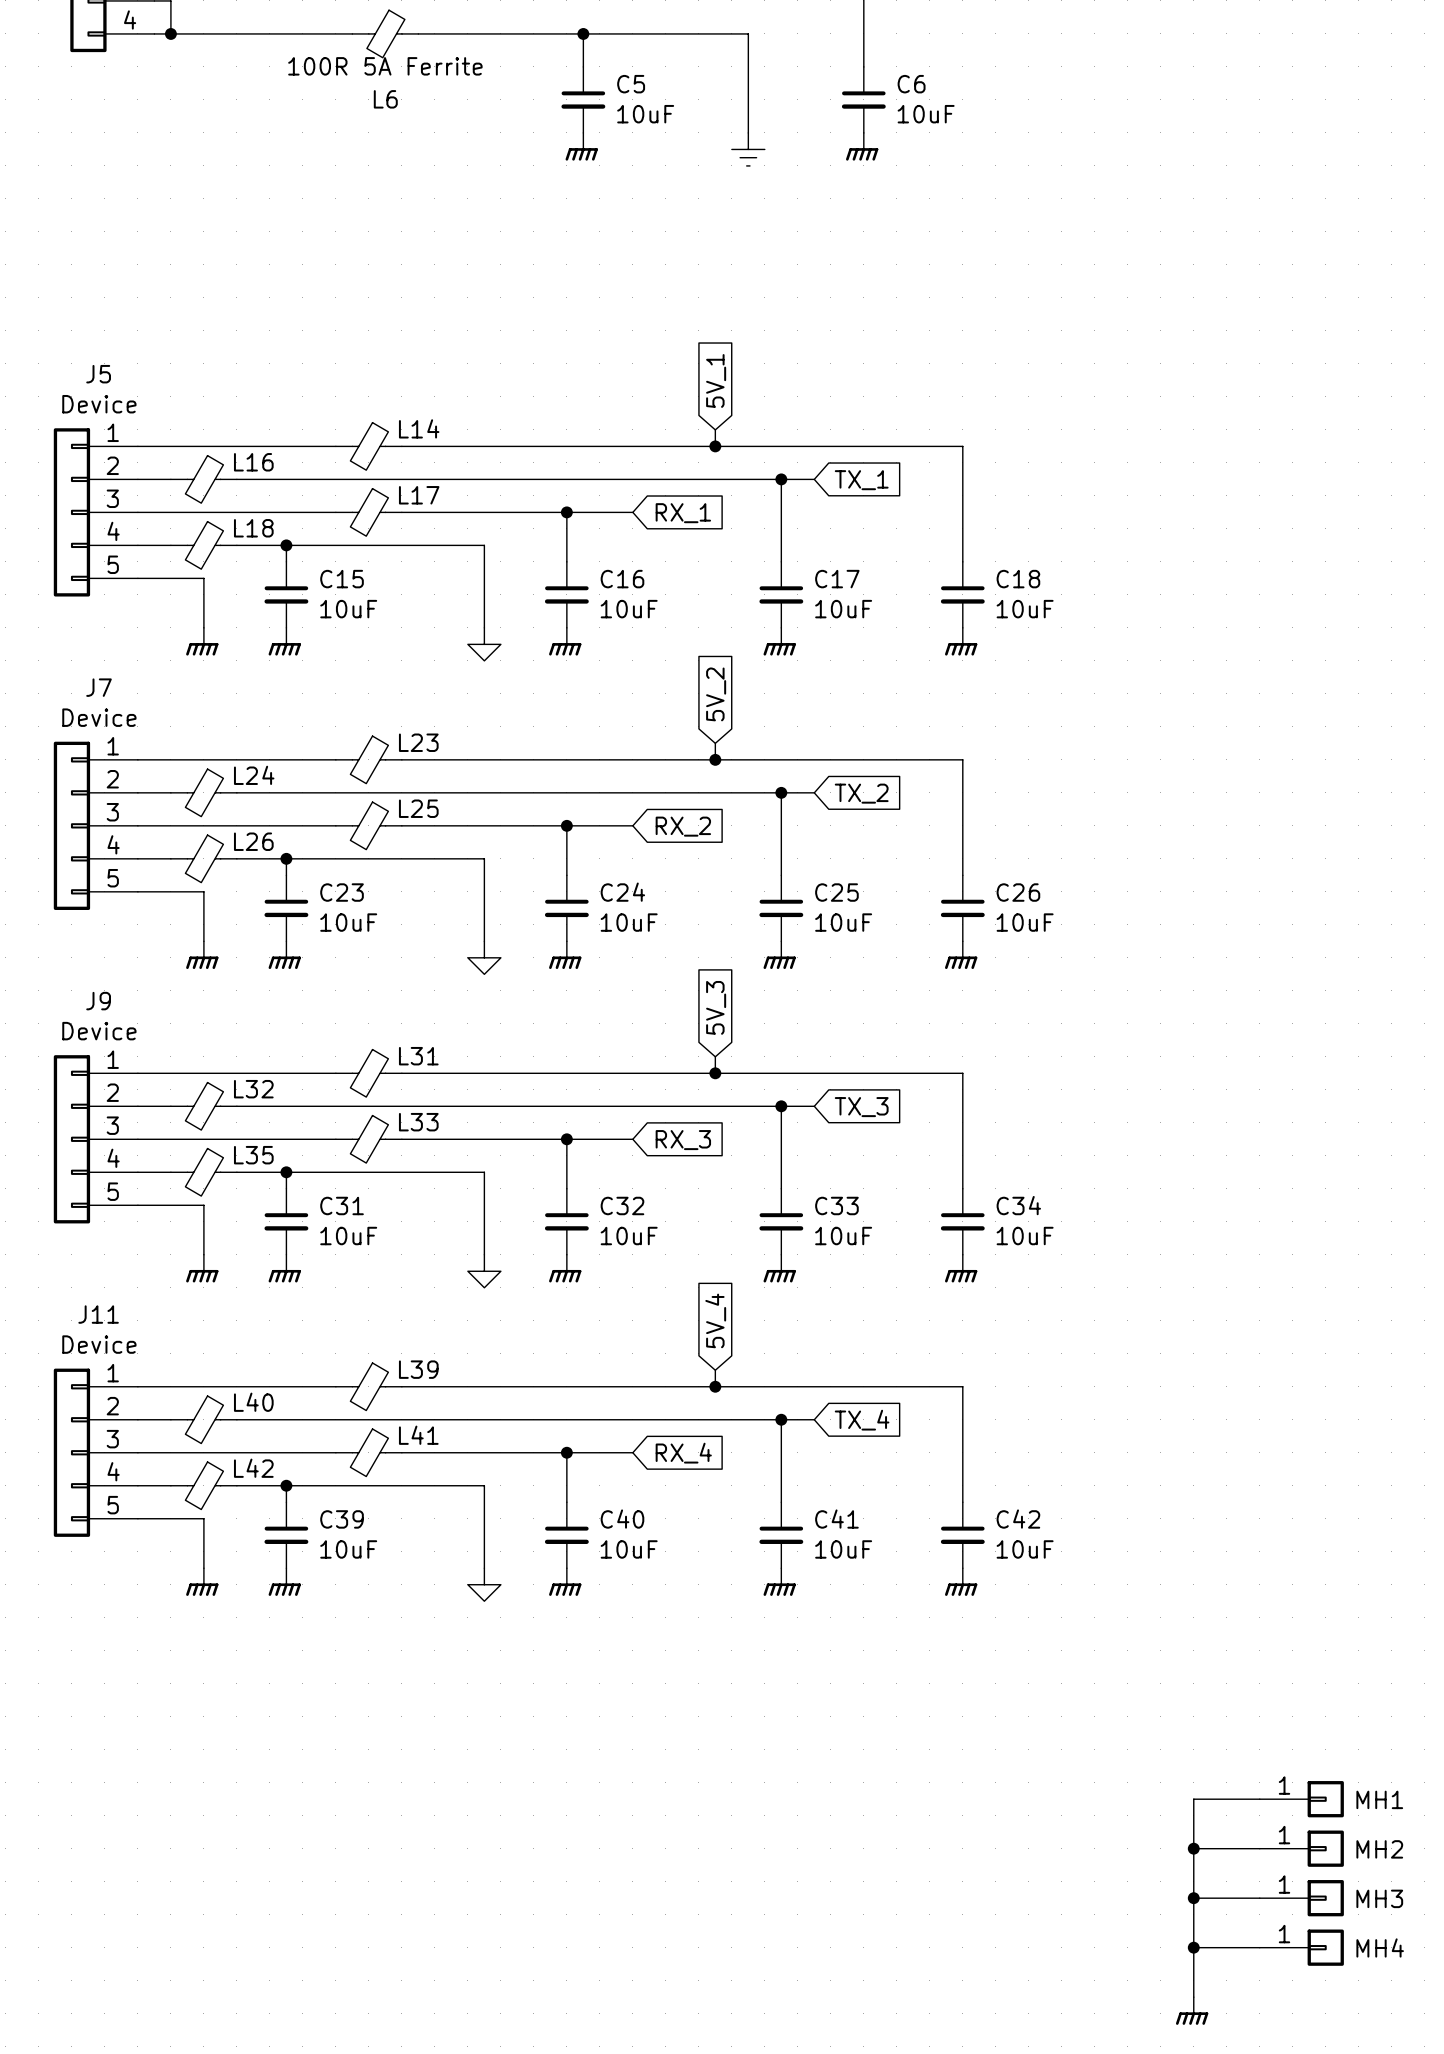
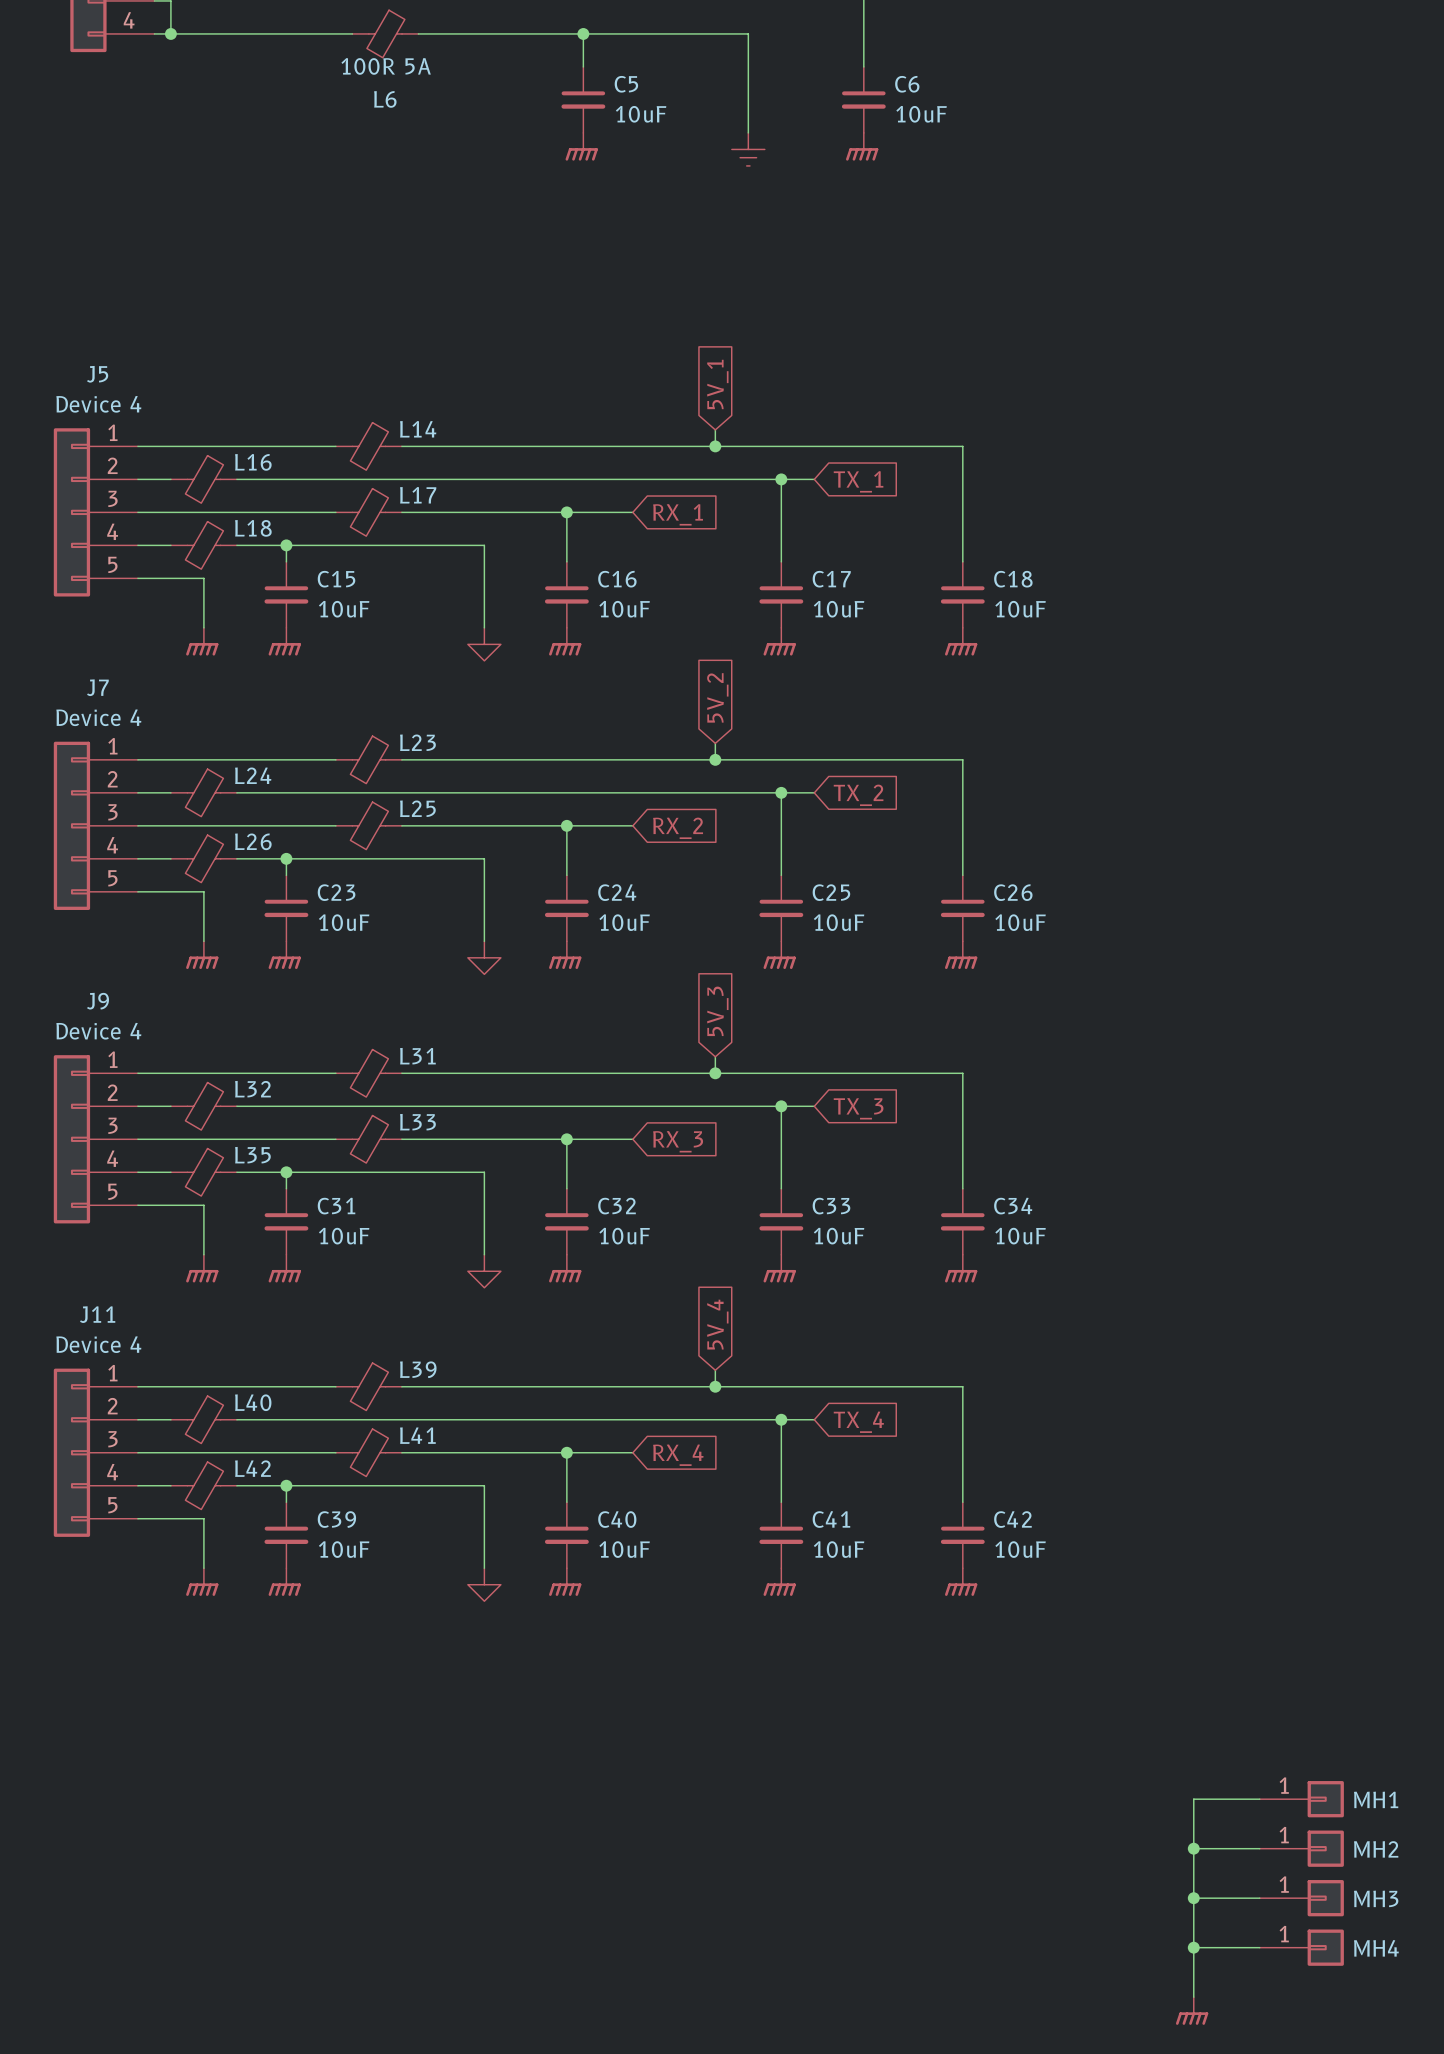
L6 value: 100R 5A Ferrite (385, 66) -> 100R 5A (386, 66)
J5 value: Device (99, 404) -> Device 4 (98, 404)
J7 value: Device (99, 717) -> Device 4 (98, 717)
J9 value: Device (99, 1031) -> Device 4 (98, 1031)
J11 value: Device (99, 1344) -> Device 4 (98, 1344)

